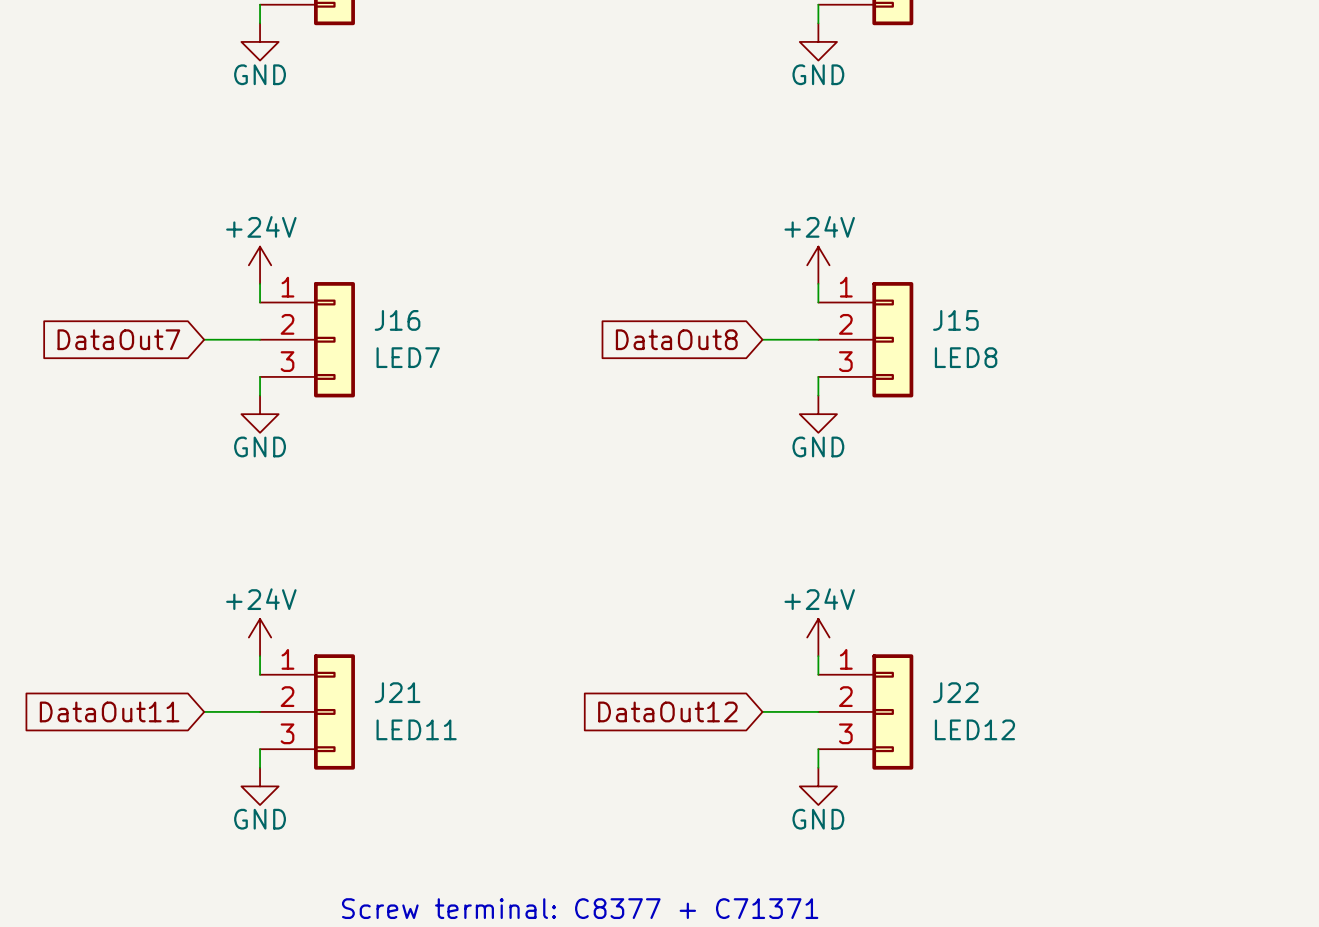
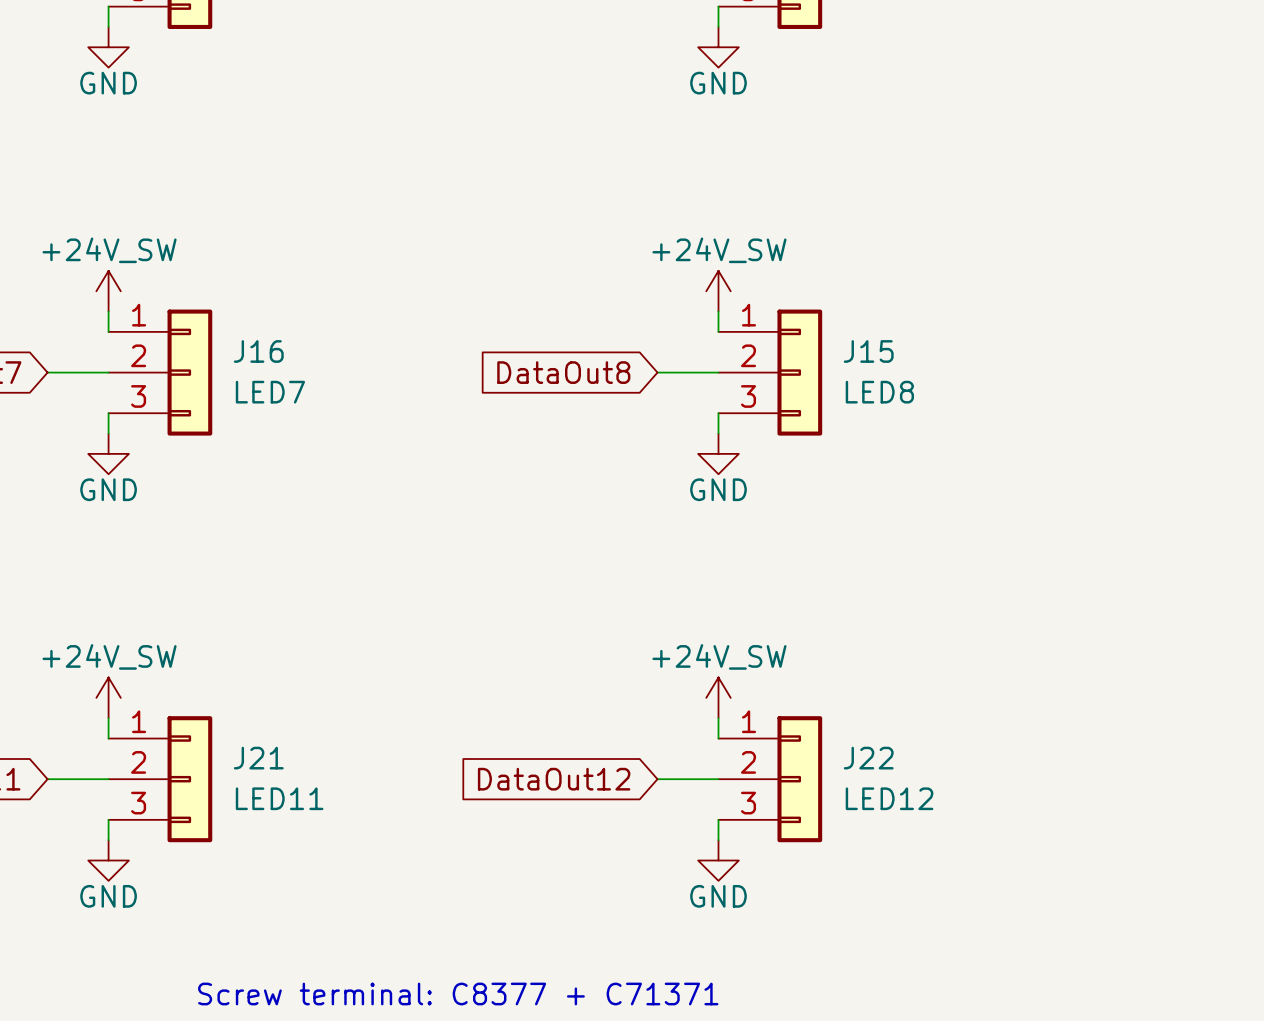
power symbol: +24V (260, 265) -> +24V_SW (108, 291)
power symbol: +24V (818, 265) -> +24V_SW (718, 291)
power symbol: +24V (260, 637) -> +24V_SW (108, 697)
power symbol: +24V (818, 637) -> +24V_SW (718, 697)

